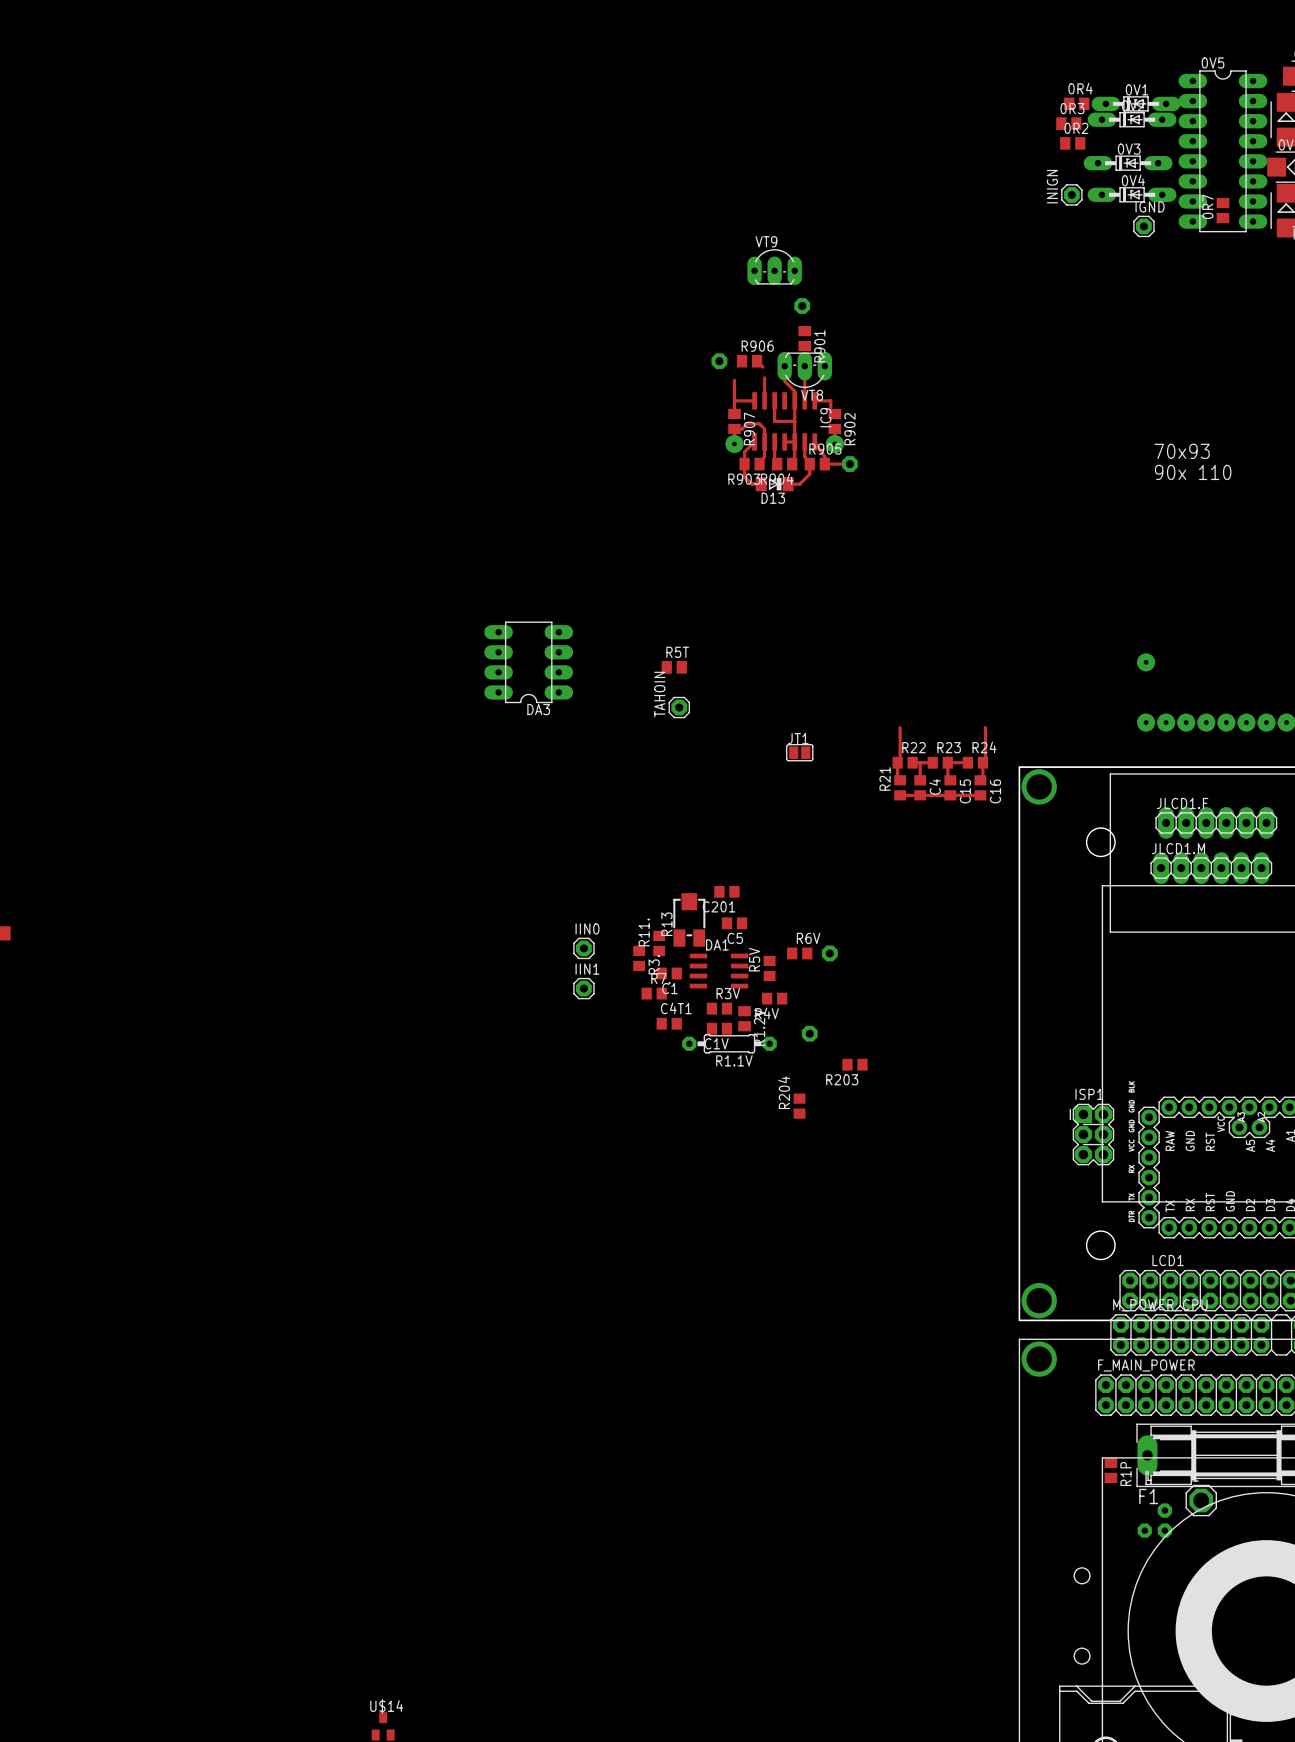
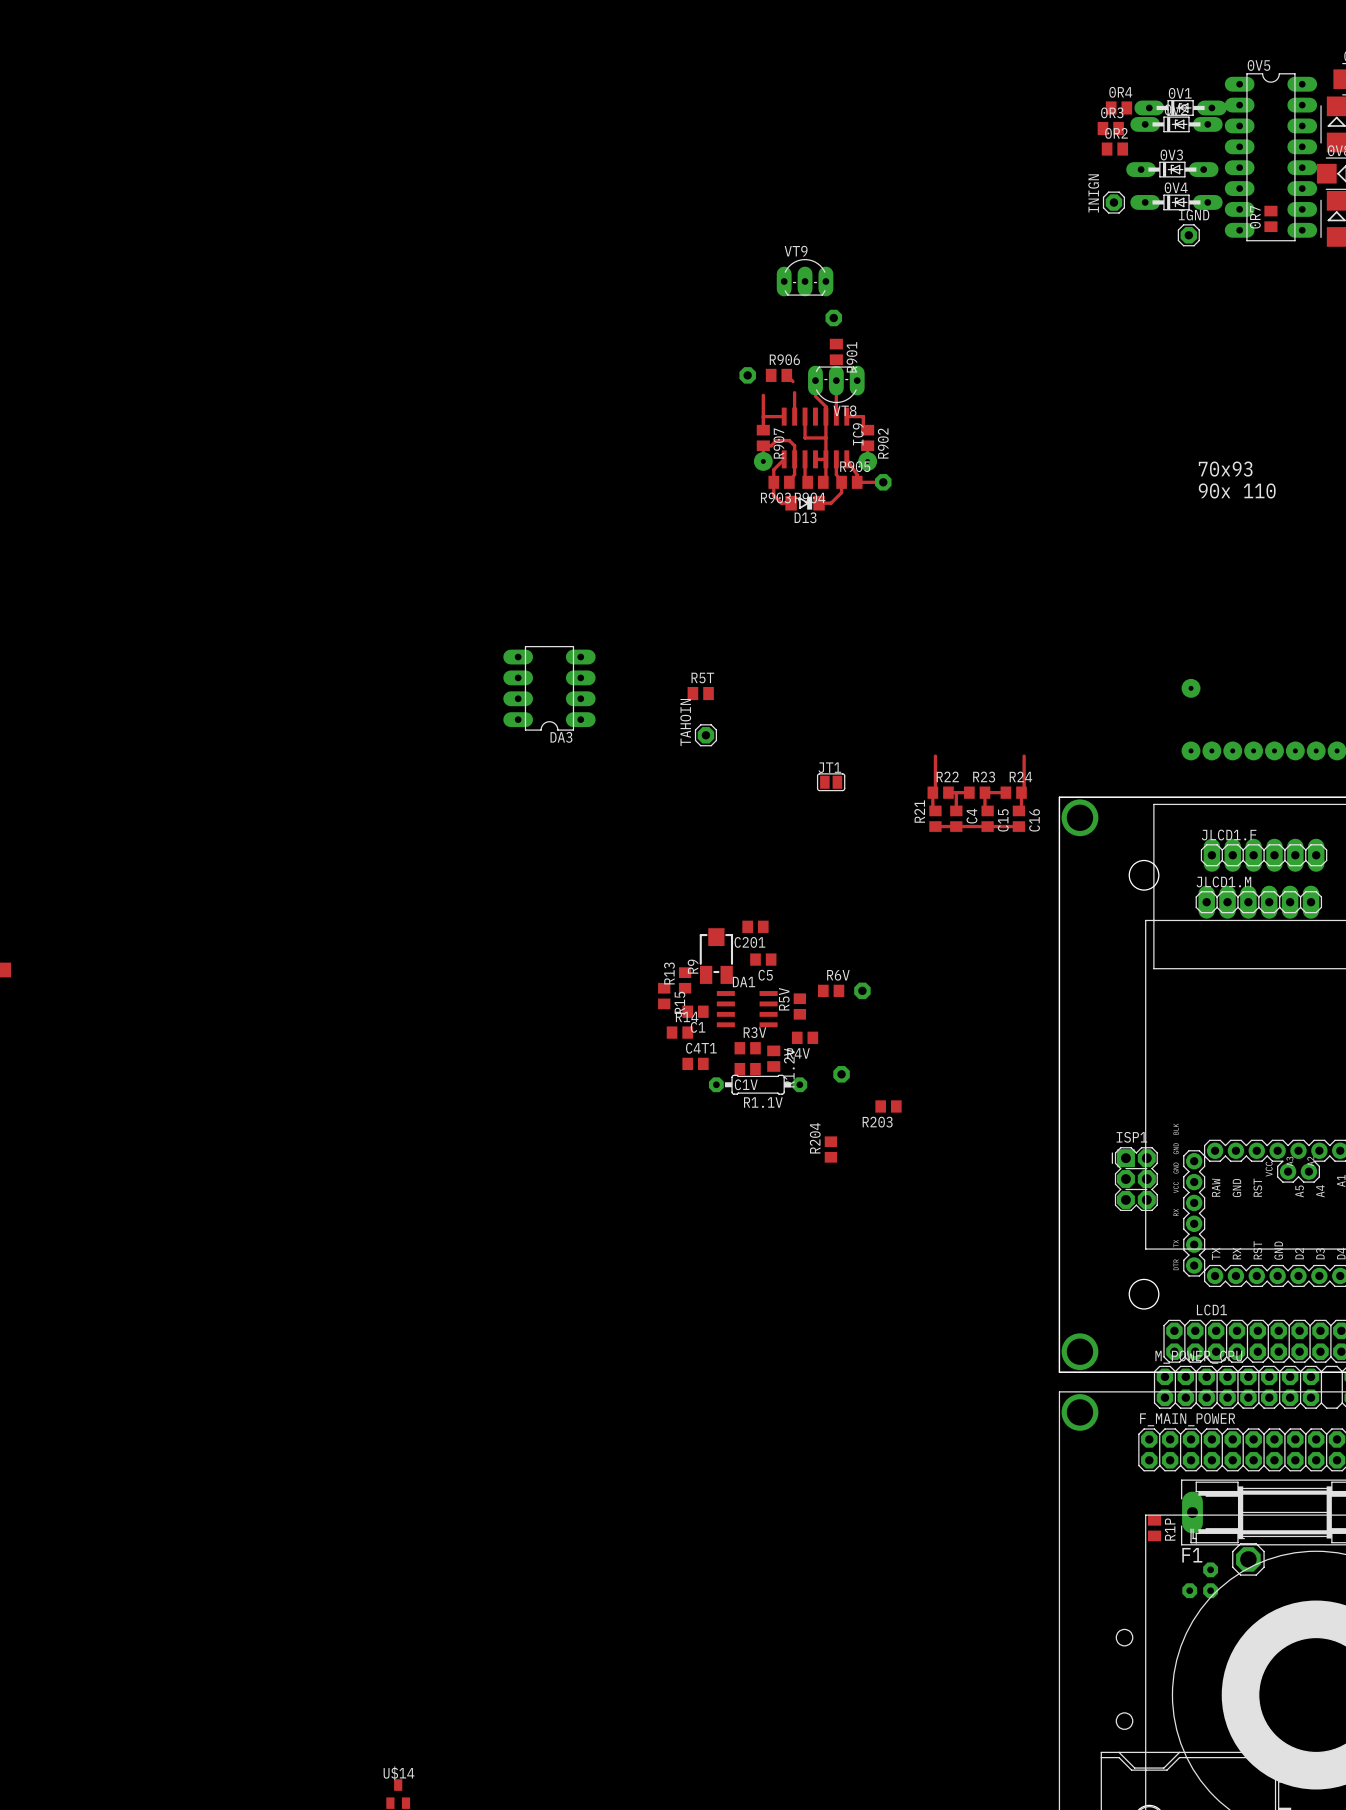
R13 name: R13 (666, 924) -> R9 (693, 966)
R11. name: R11. (644, 932) -> R13 (669, 973)
IIN0: (583, 948) -> none
R3. name: R3. (654, 964) -> R15 (679, 1002)
R7. name: R7. (660, 978) -> R14 (687, 1016)
IIN1: (583, 988) -> none

